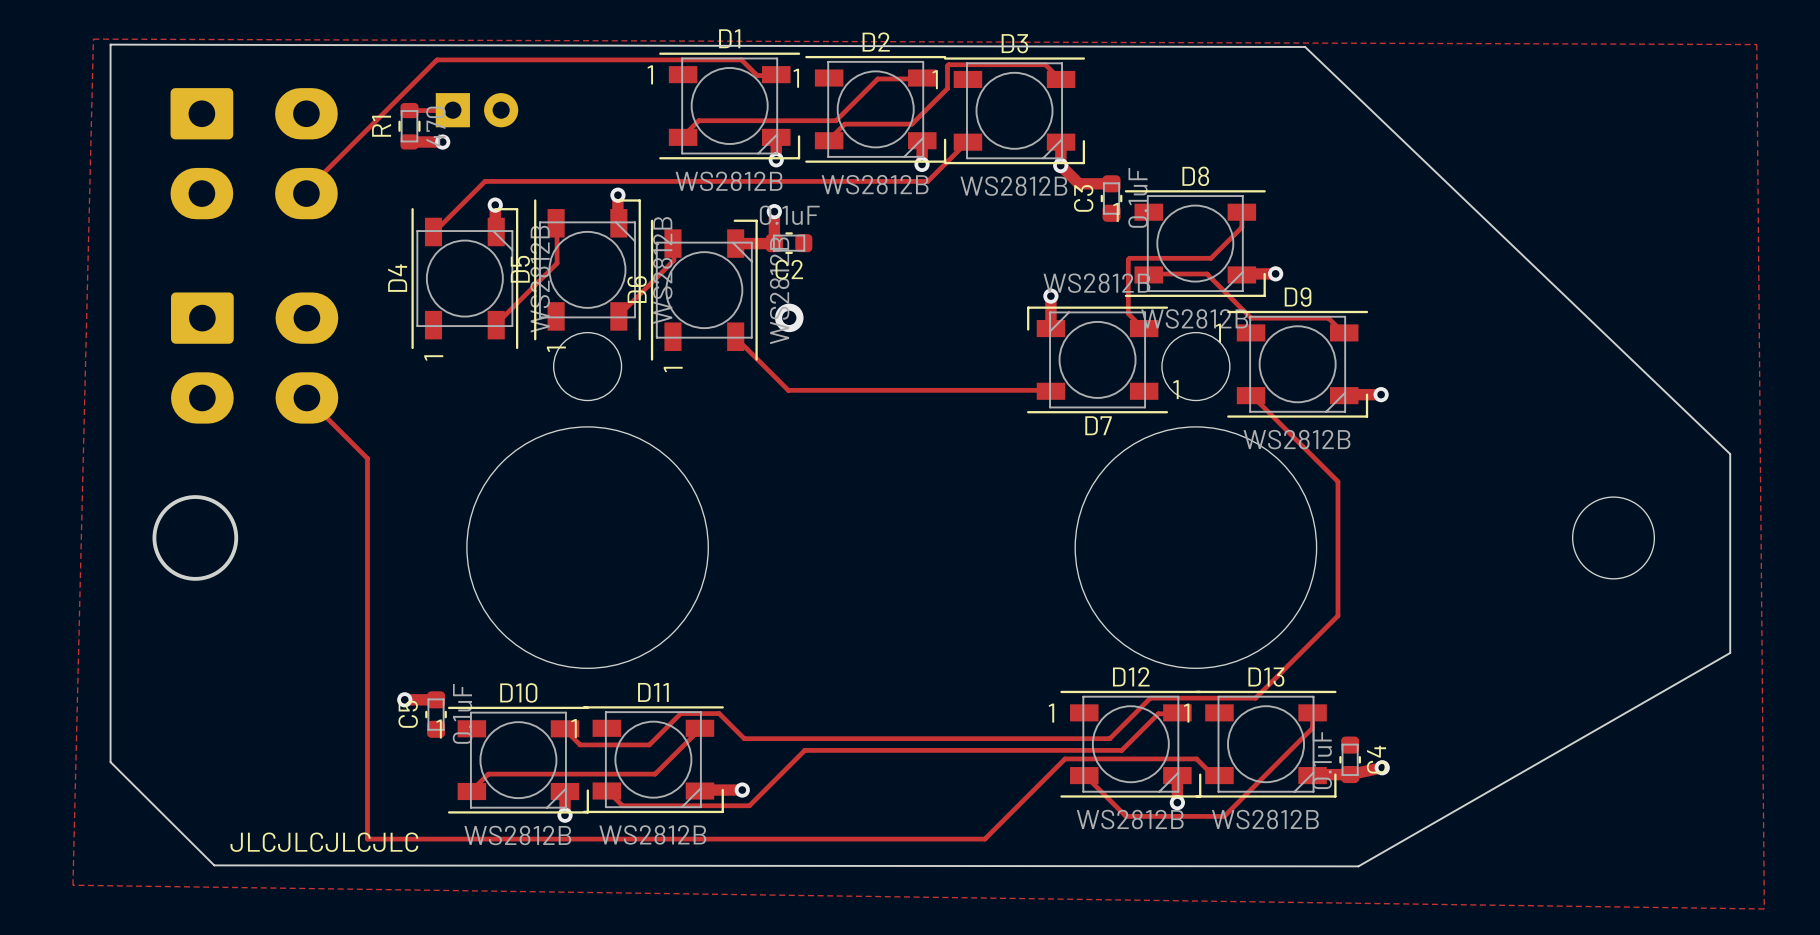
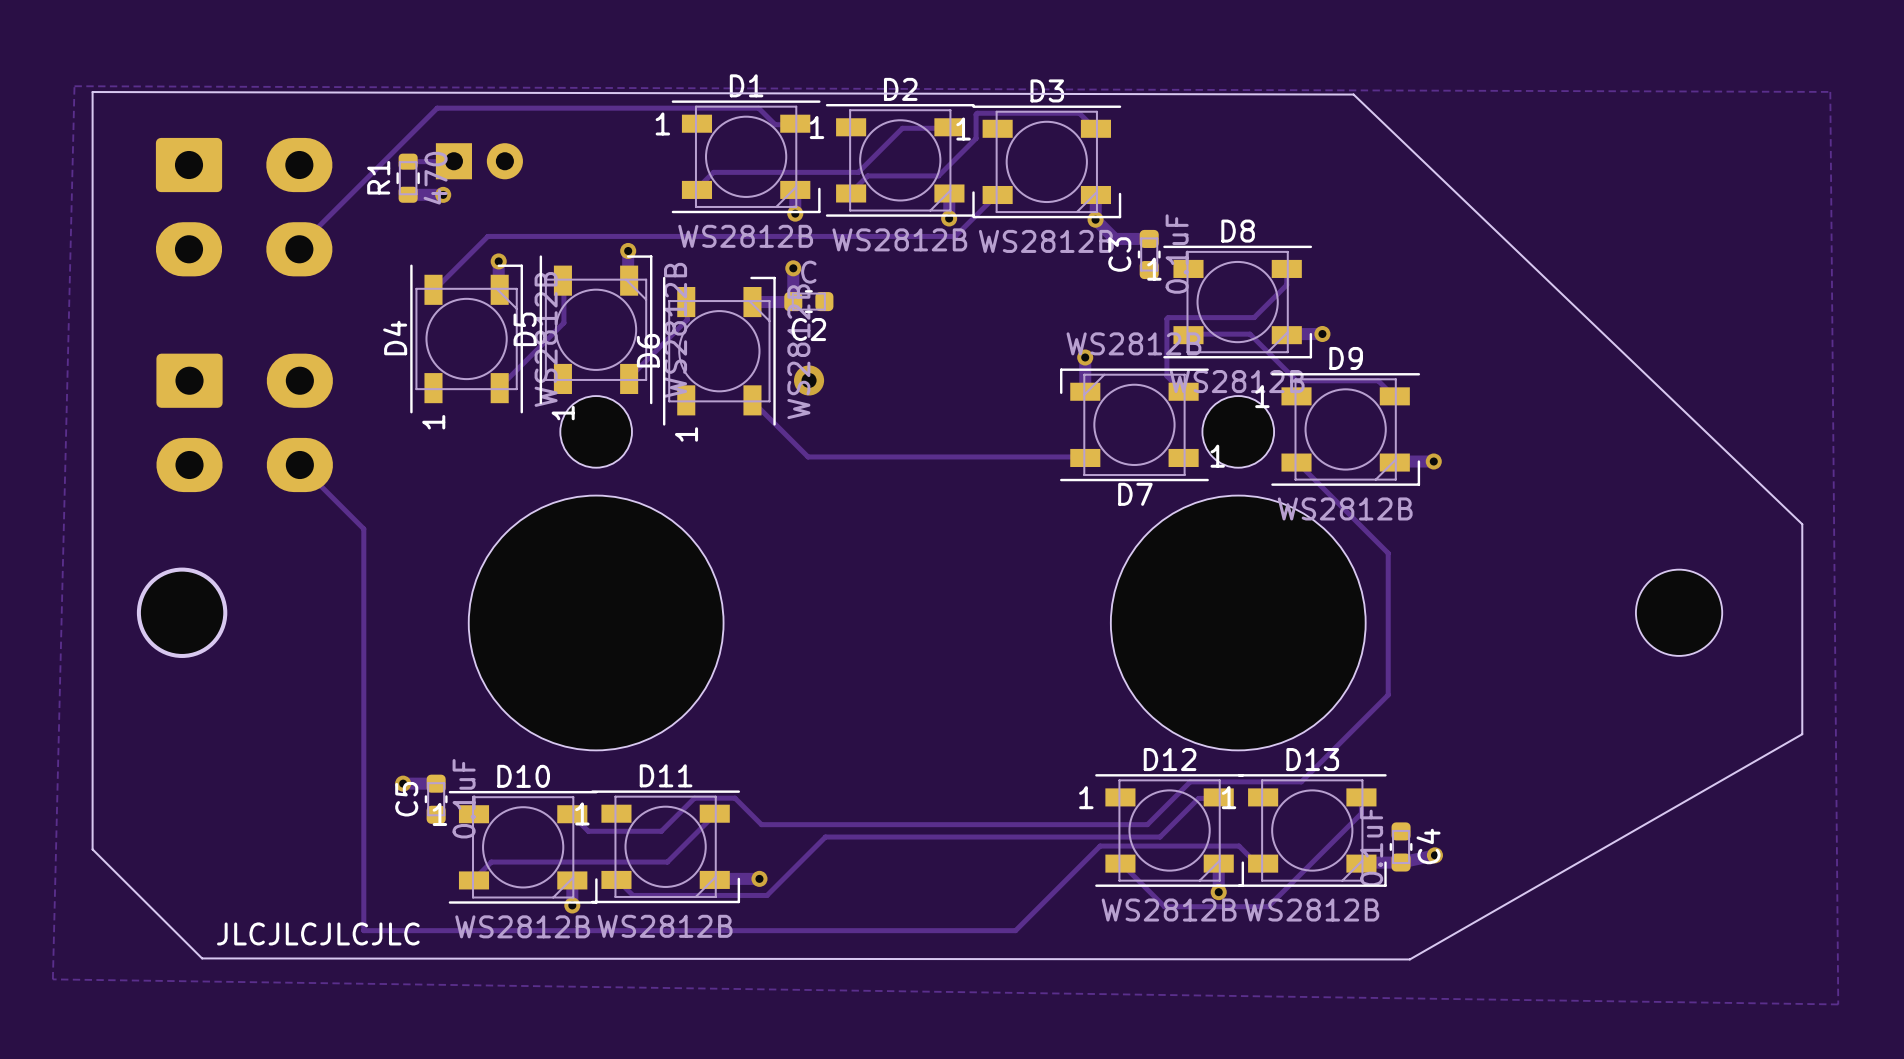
C2 value: 0.1uF (789, 215) -> C (808, 272)

